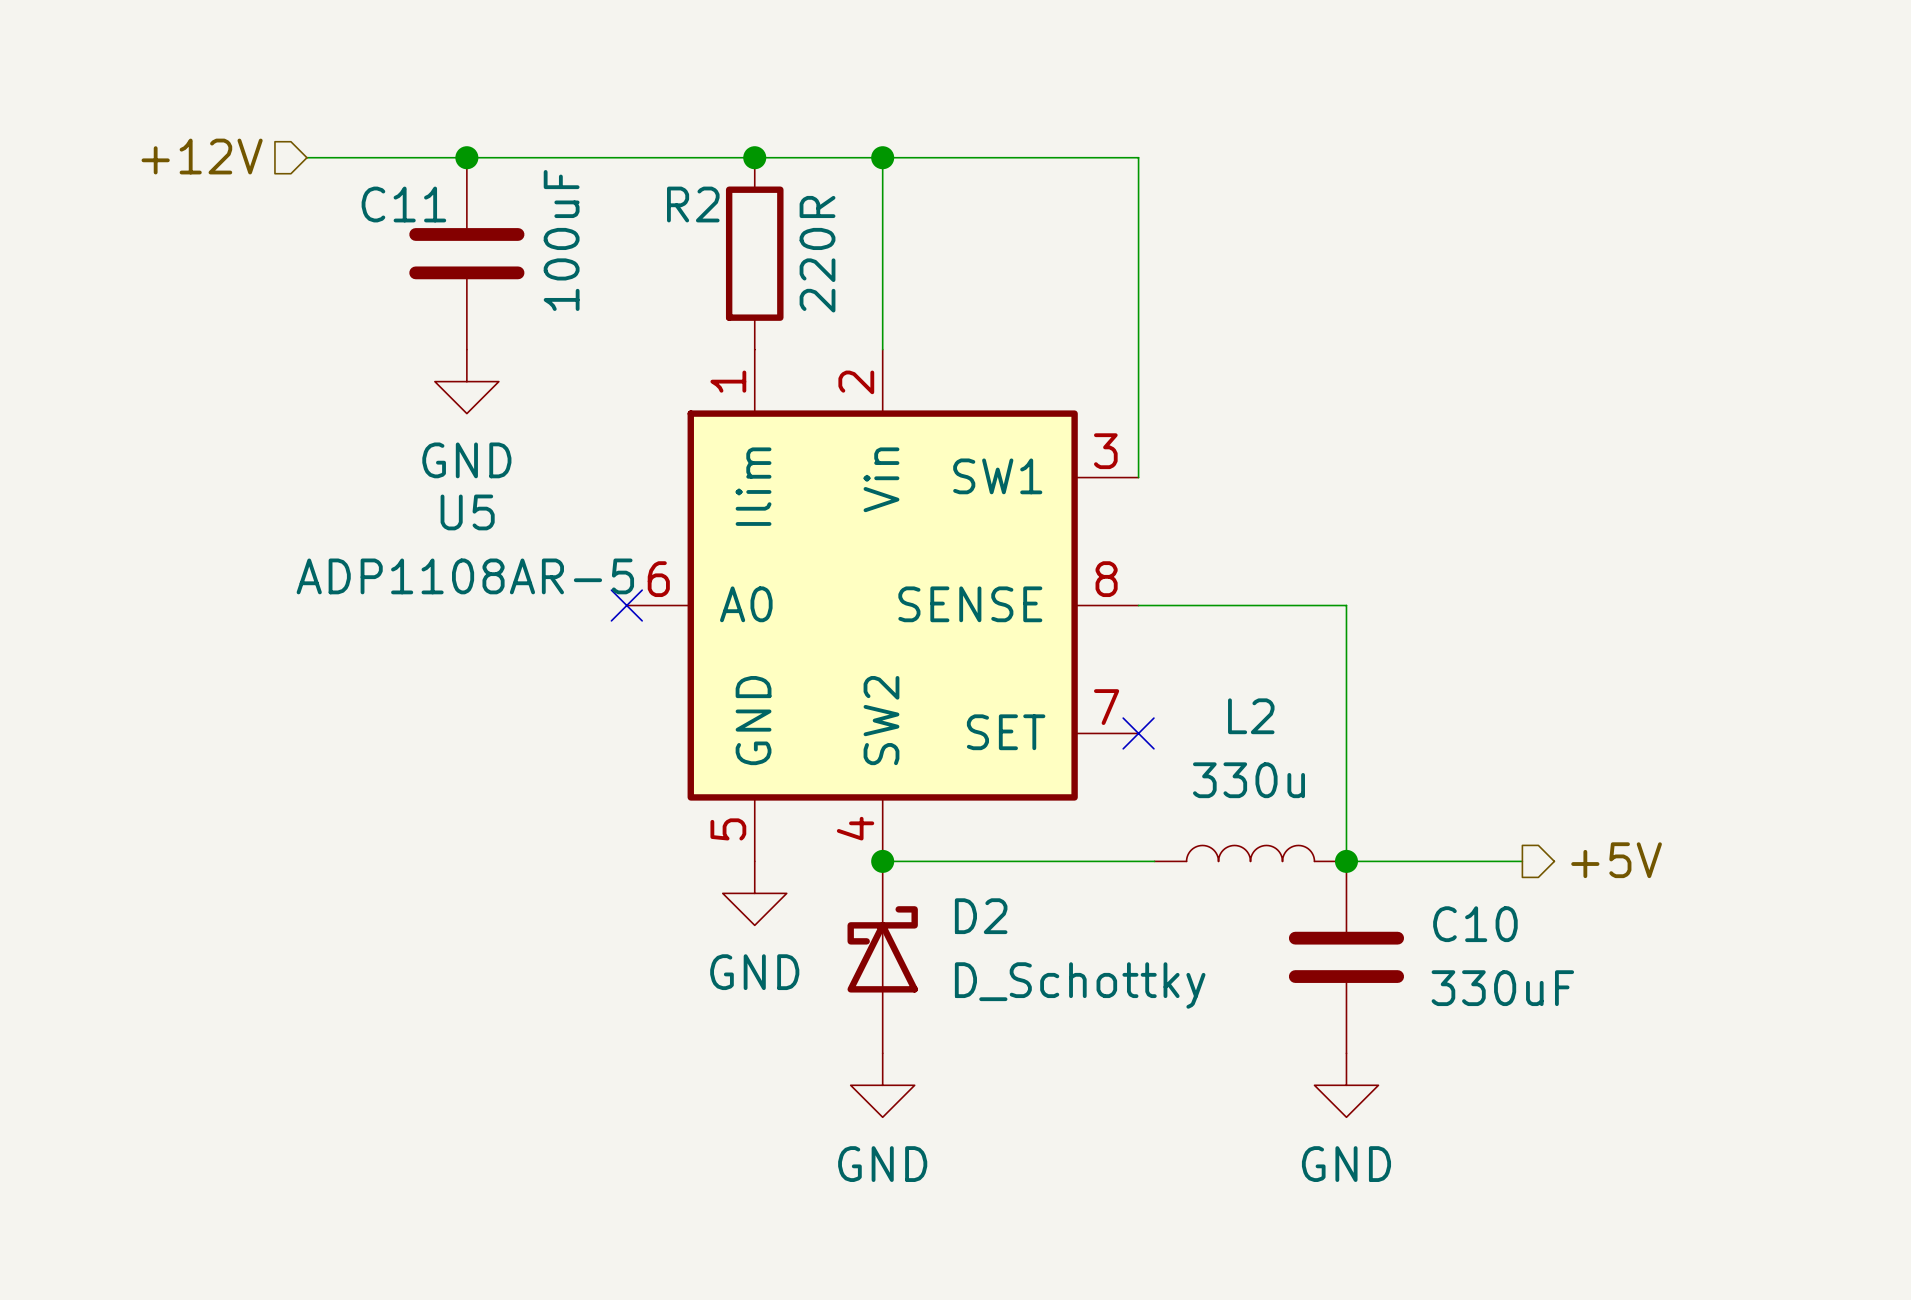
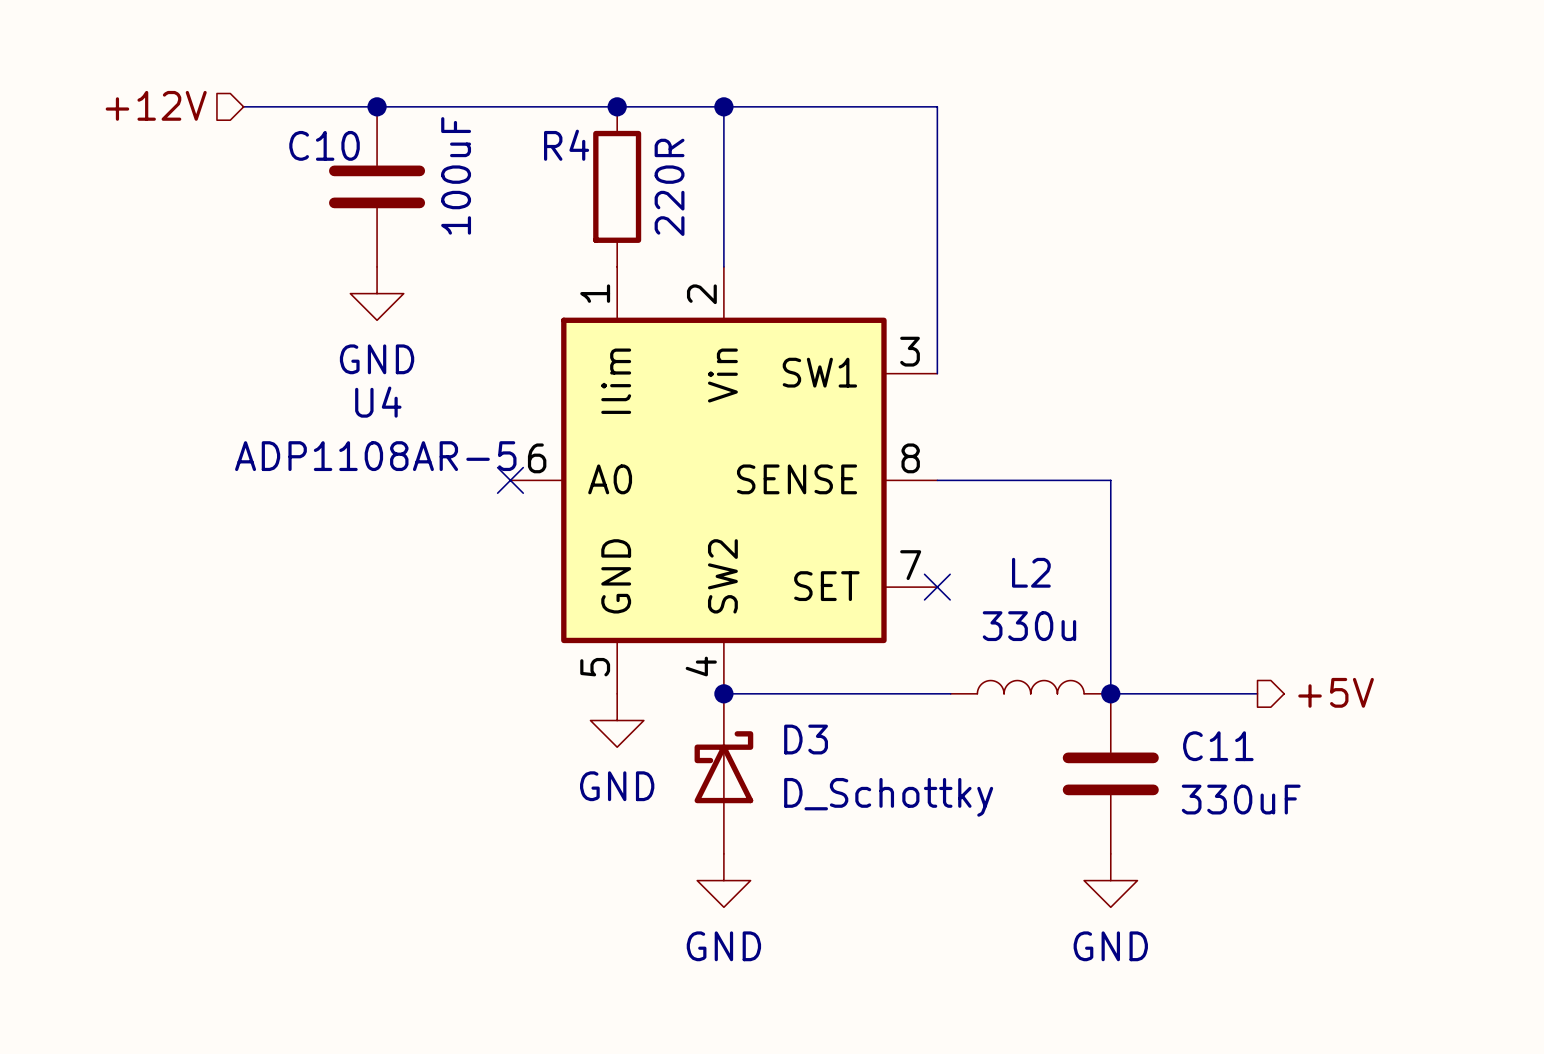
C11 name: C11 (403, 204) -> C10 (324, 145)
R2 name: R2 (693, 204) -> R4 (566, 145)
U5 name: U5 (467, 512) -> U4 (378, 402)
D2 name: D2 (981, 916) -> D3 (806, 739)
C10 name: C10 (1475, 924) -> C11 (1218, 746)

